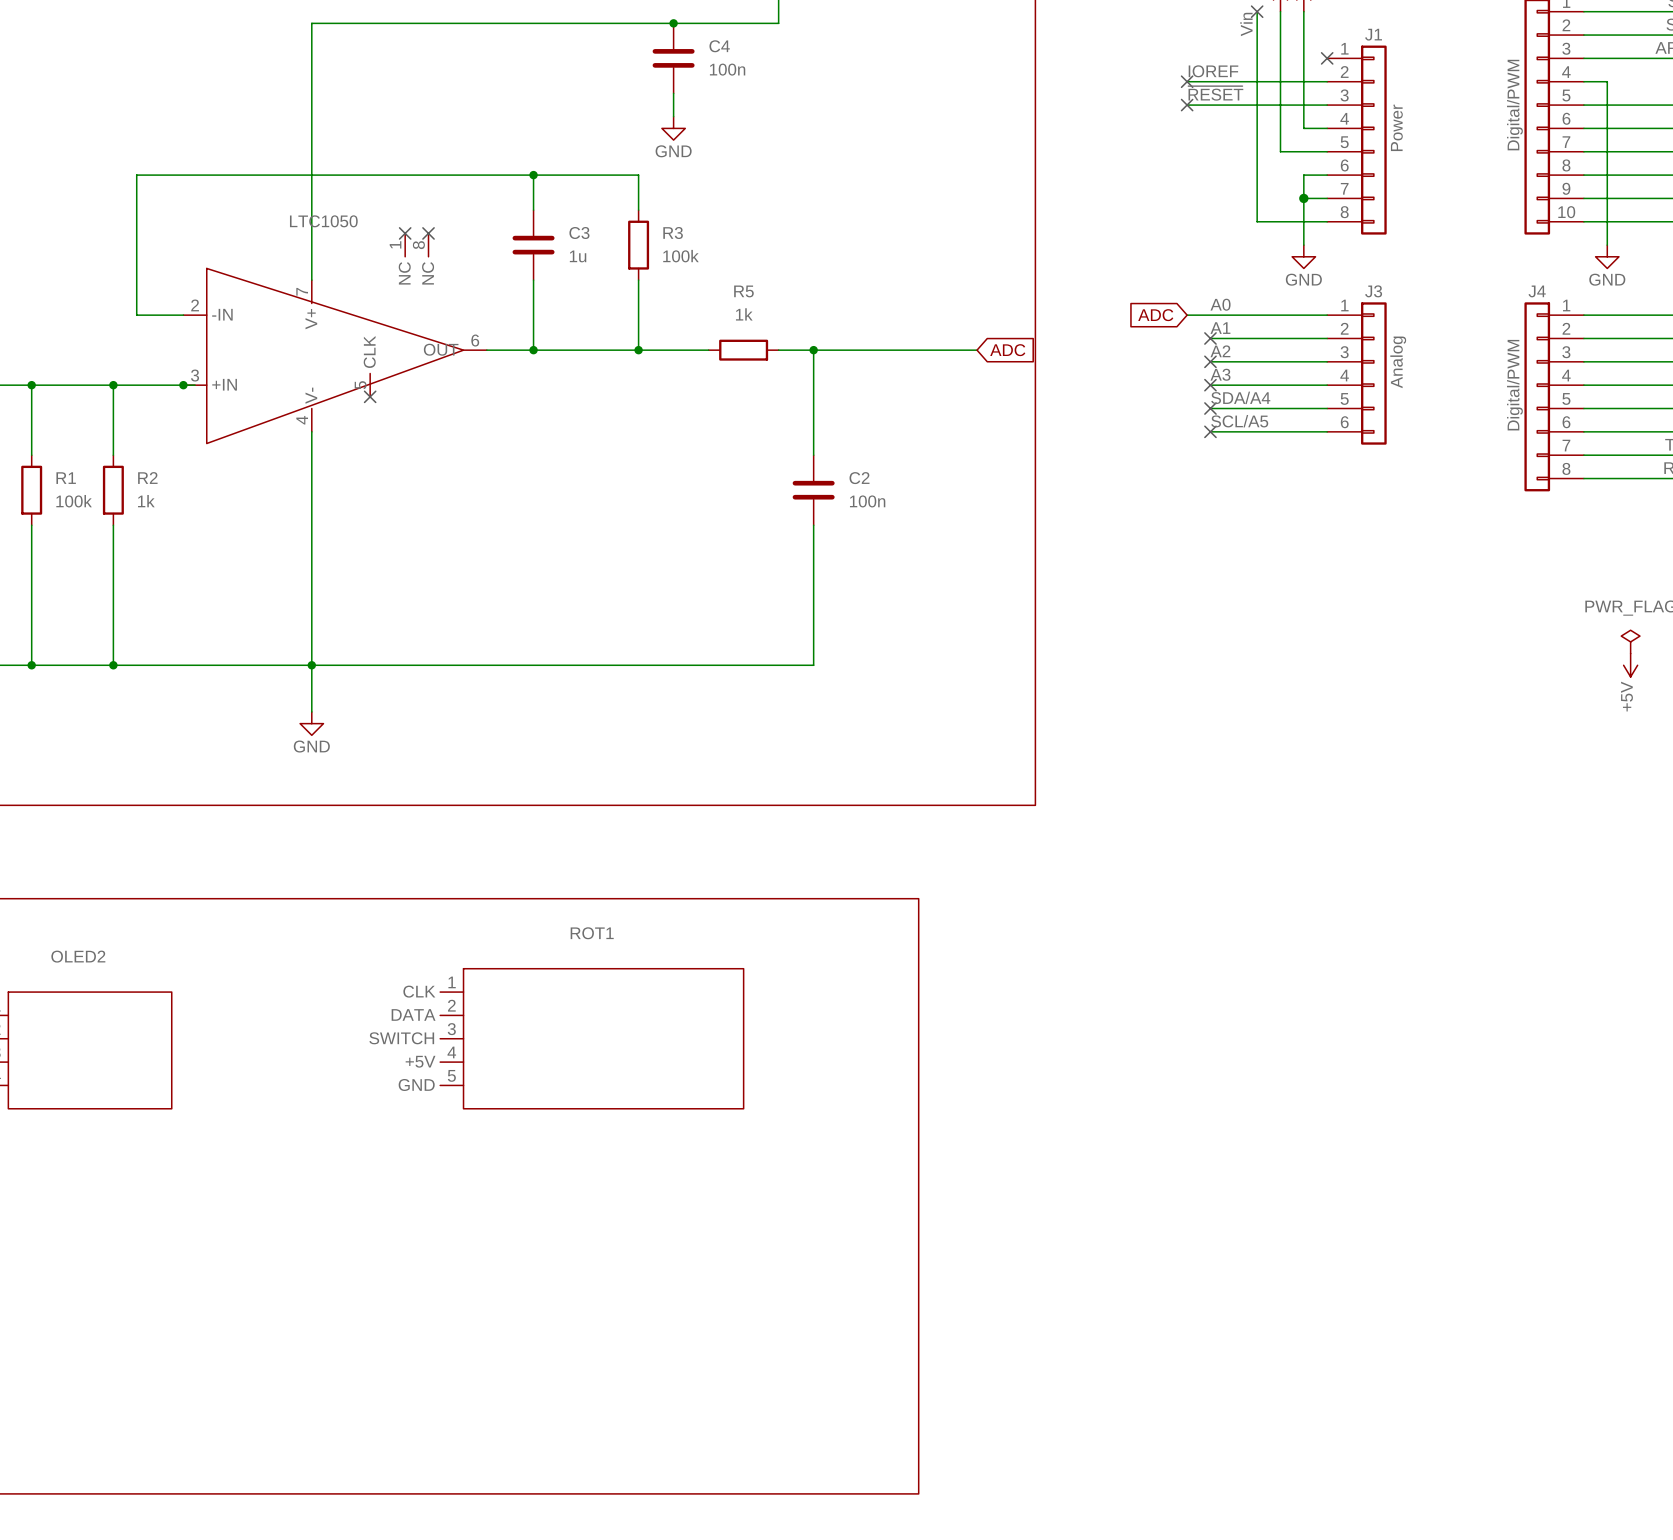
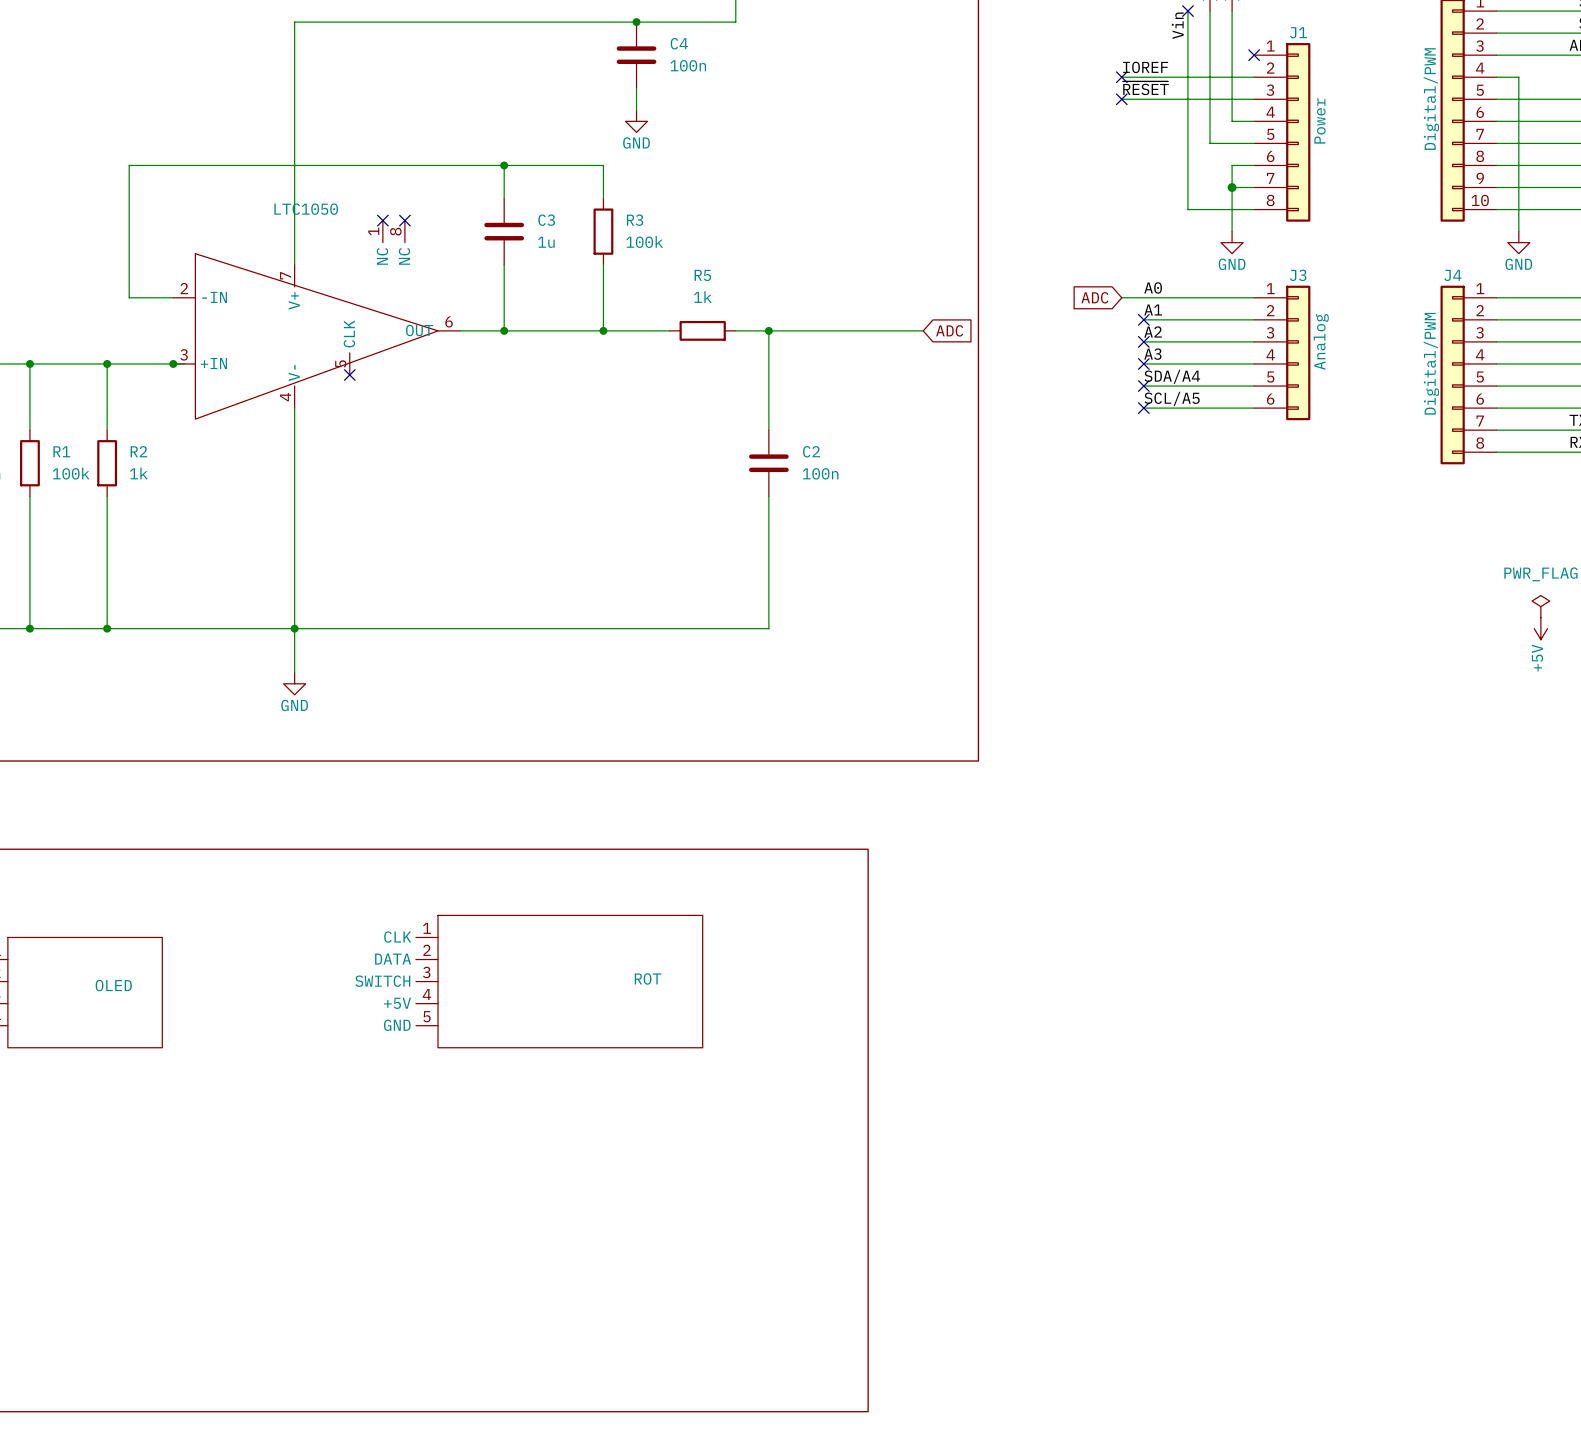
ROT1 name: ROT1 (592, 933) -> ROT (648, 978)
OLED2 name: OLED2 (78, 956) -> OLED (113, 985)

